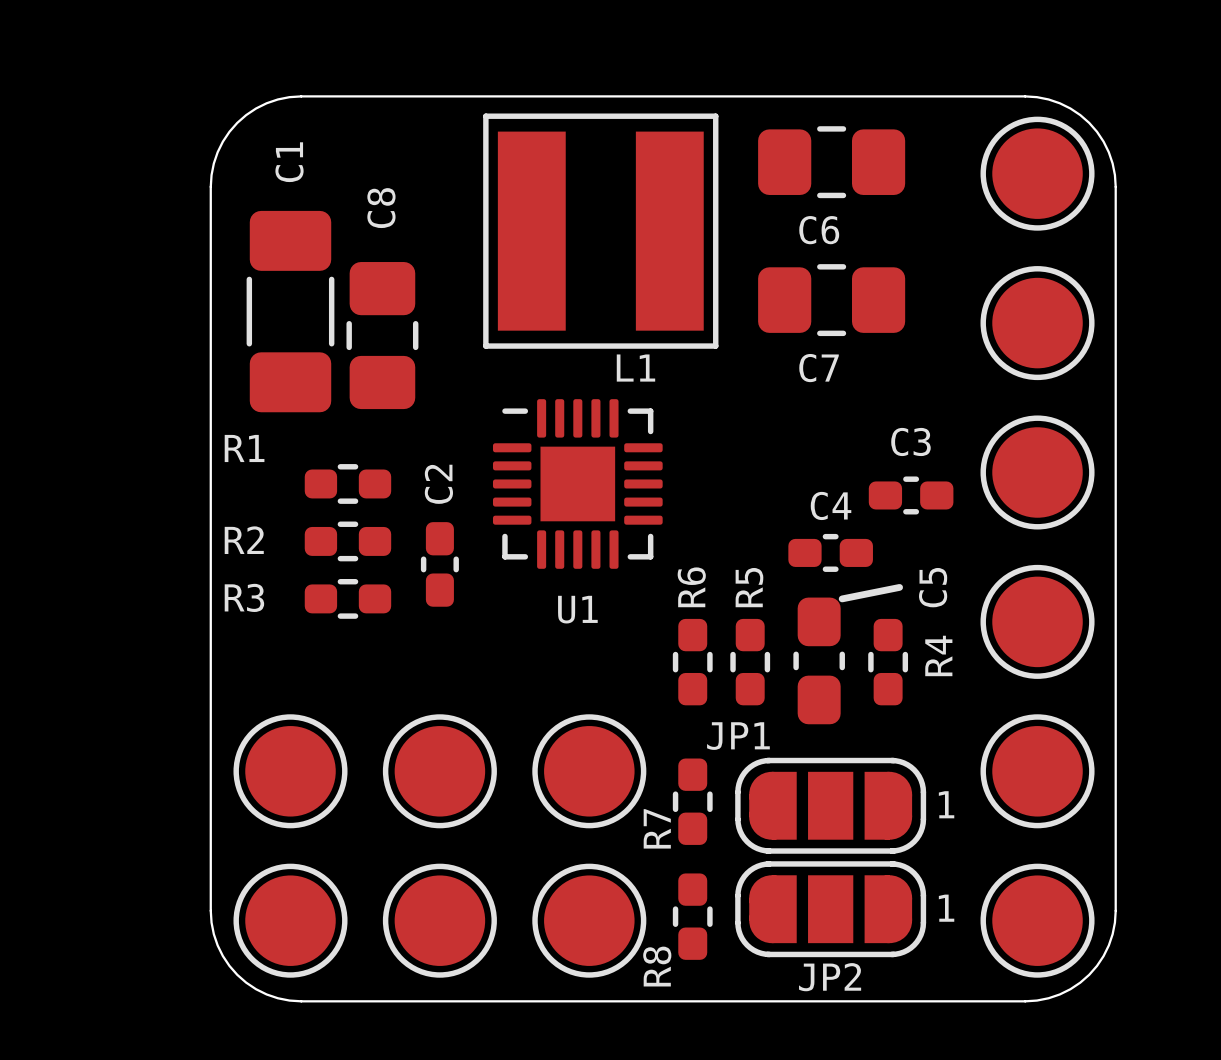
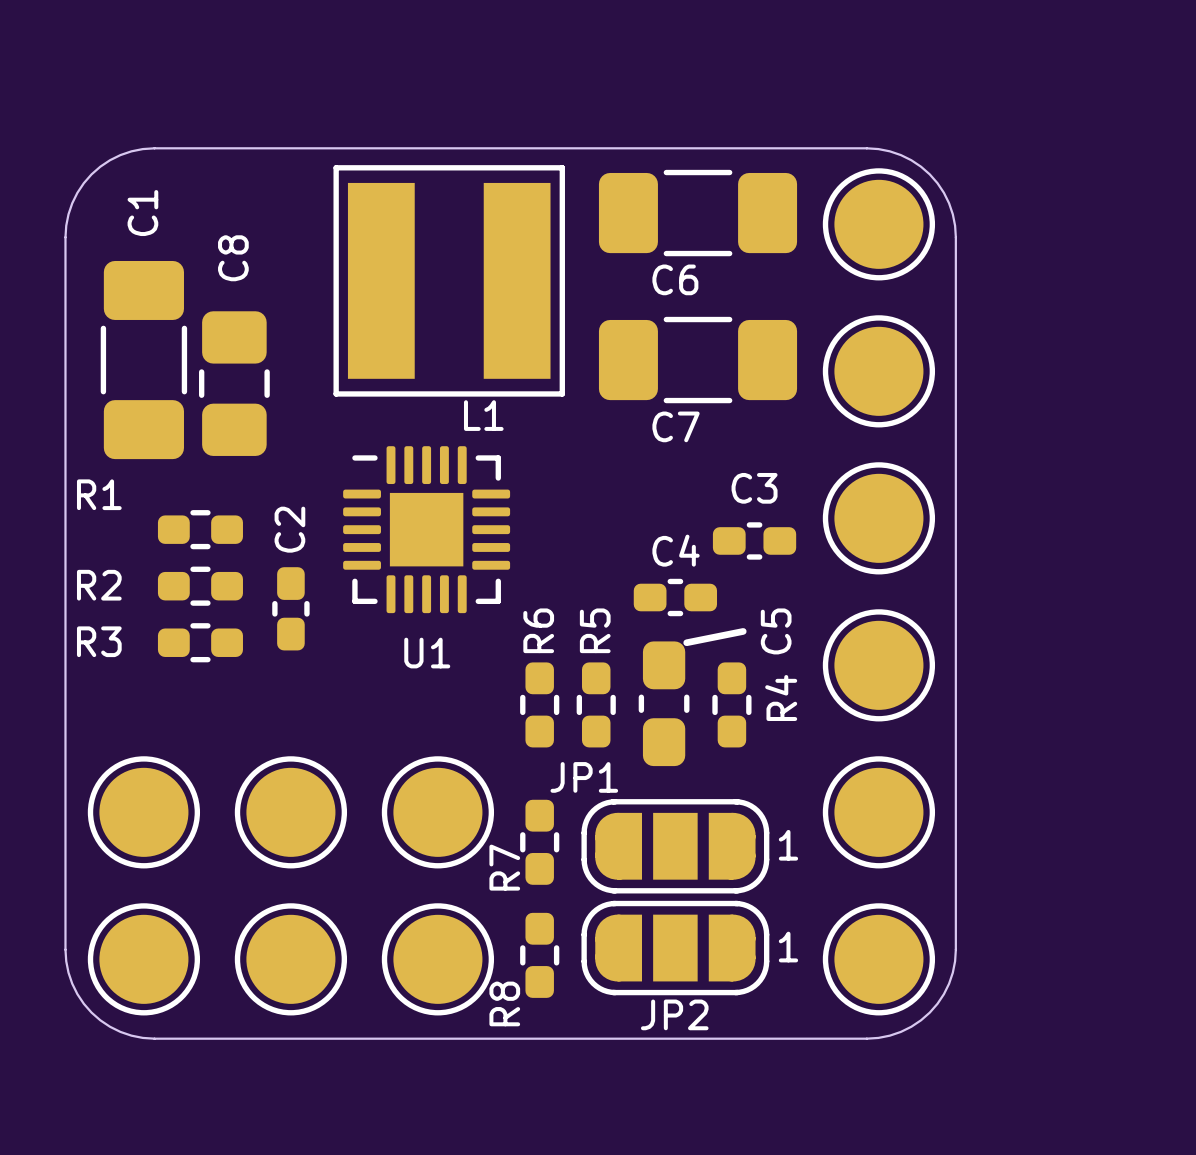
C6 footprint: [758, 126, 906, 199] -> [598, 169, 798, 257]
C7 footprint: [758, 264, 906, 337] -> [598, 316, 798, 404]

